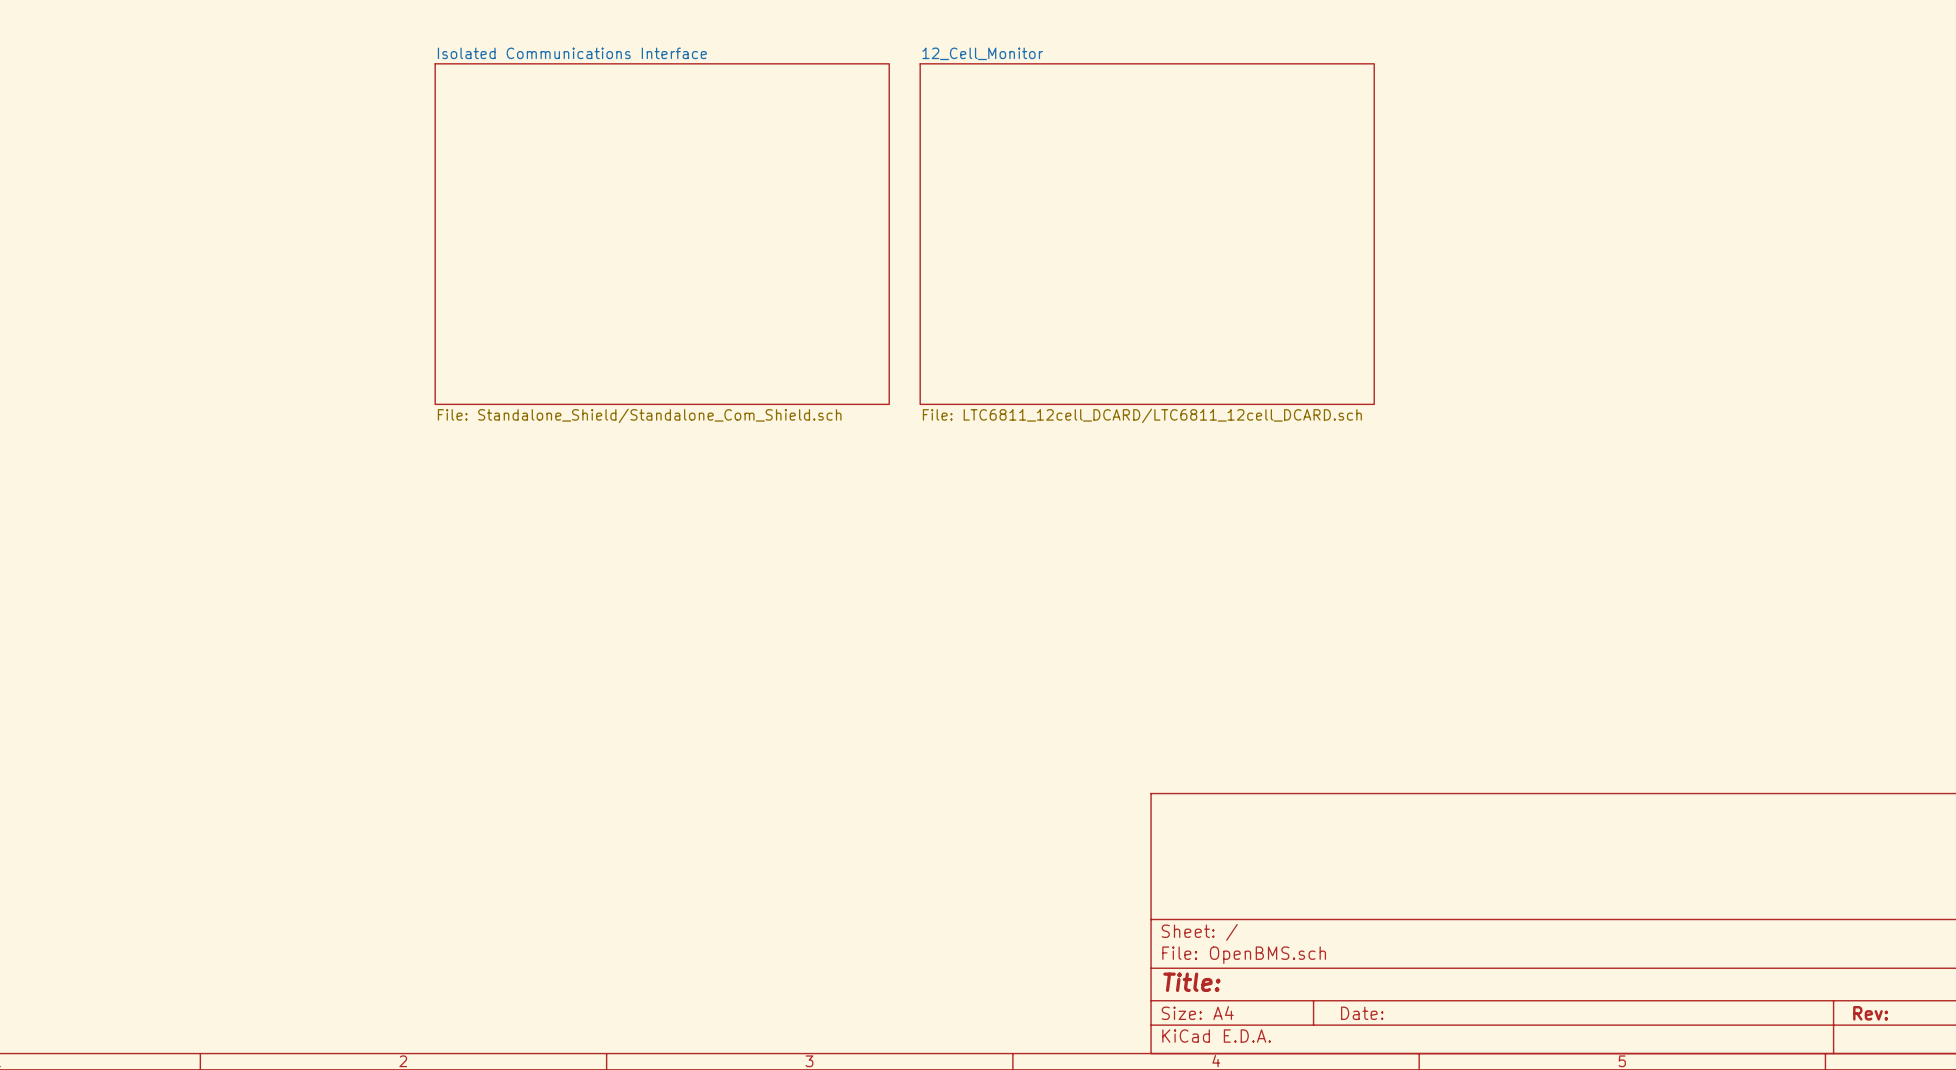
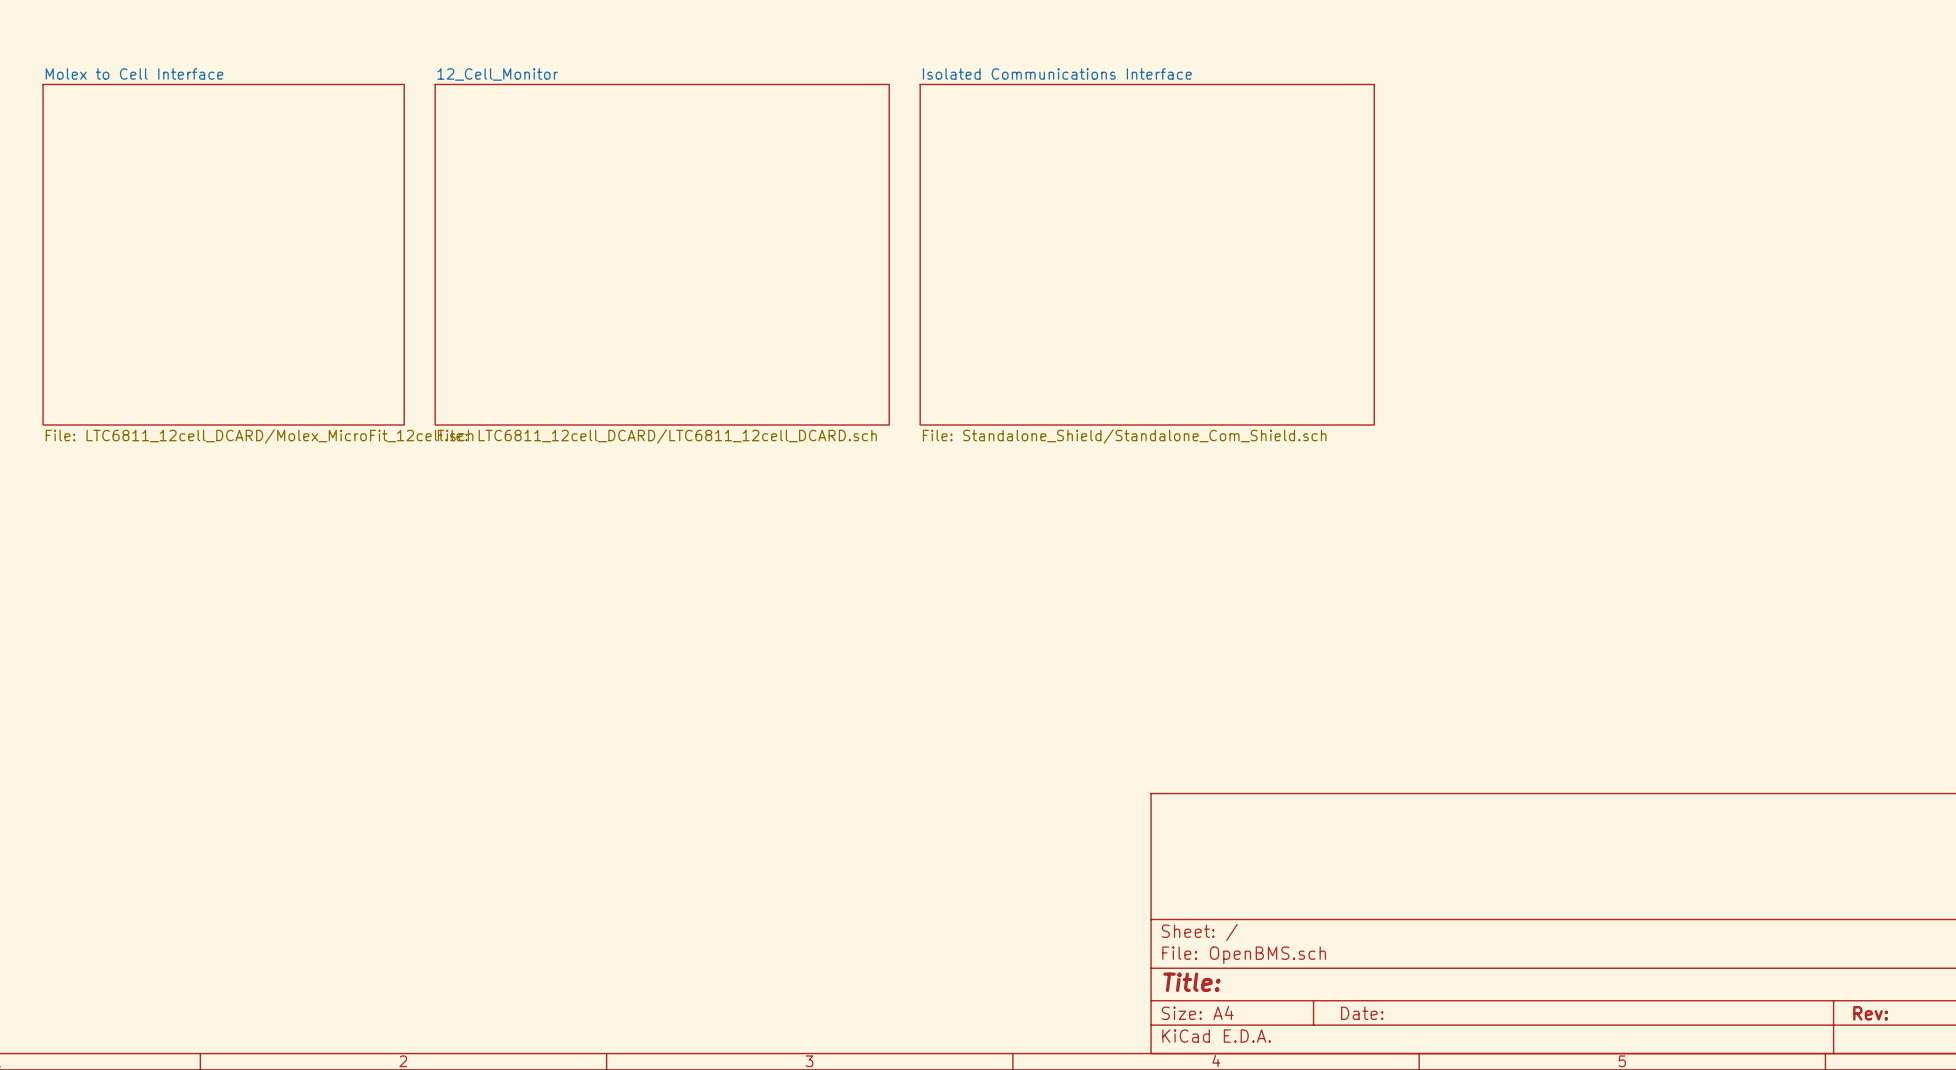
sheet Isolated Communications Interface: File: Standalone_Shield/Standalone_Com_Shield.sch (662, 234) -> none
sheet 12_Cell_Monitor position: (1147, 234) -> (662, 254)
sheet Molex to Cell Interface: none -> File: LTC6811_12cell_DCARD/Molex_MicroFit_12cell.sch (223, 254)
sheet Isolated Communications Interface: none -> File: Standalone_Shield/Standalone_Com_Shield.sch (1147, 254)

